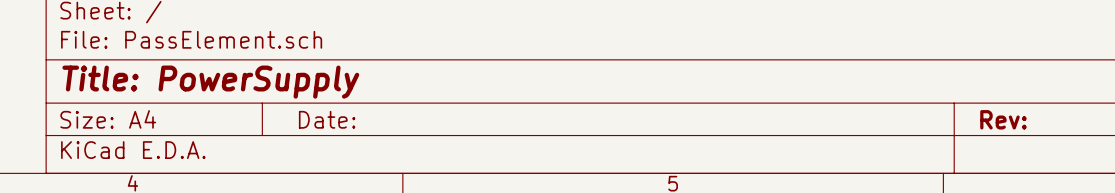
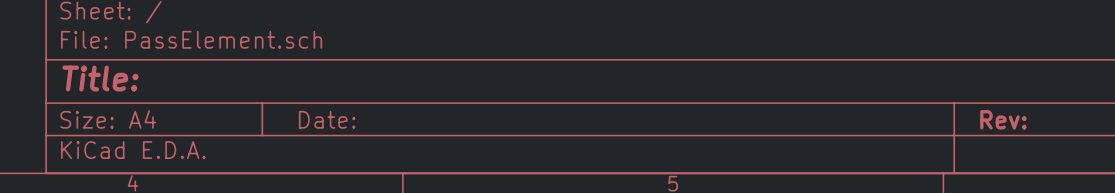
title block: Title: PowerSupply (210, 82) -> Title: (100, 78)

